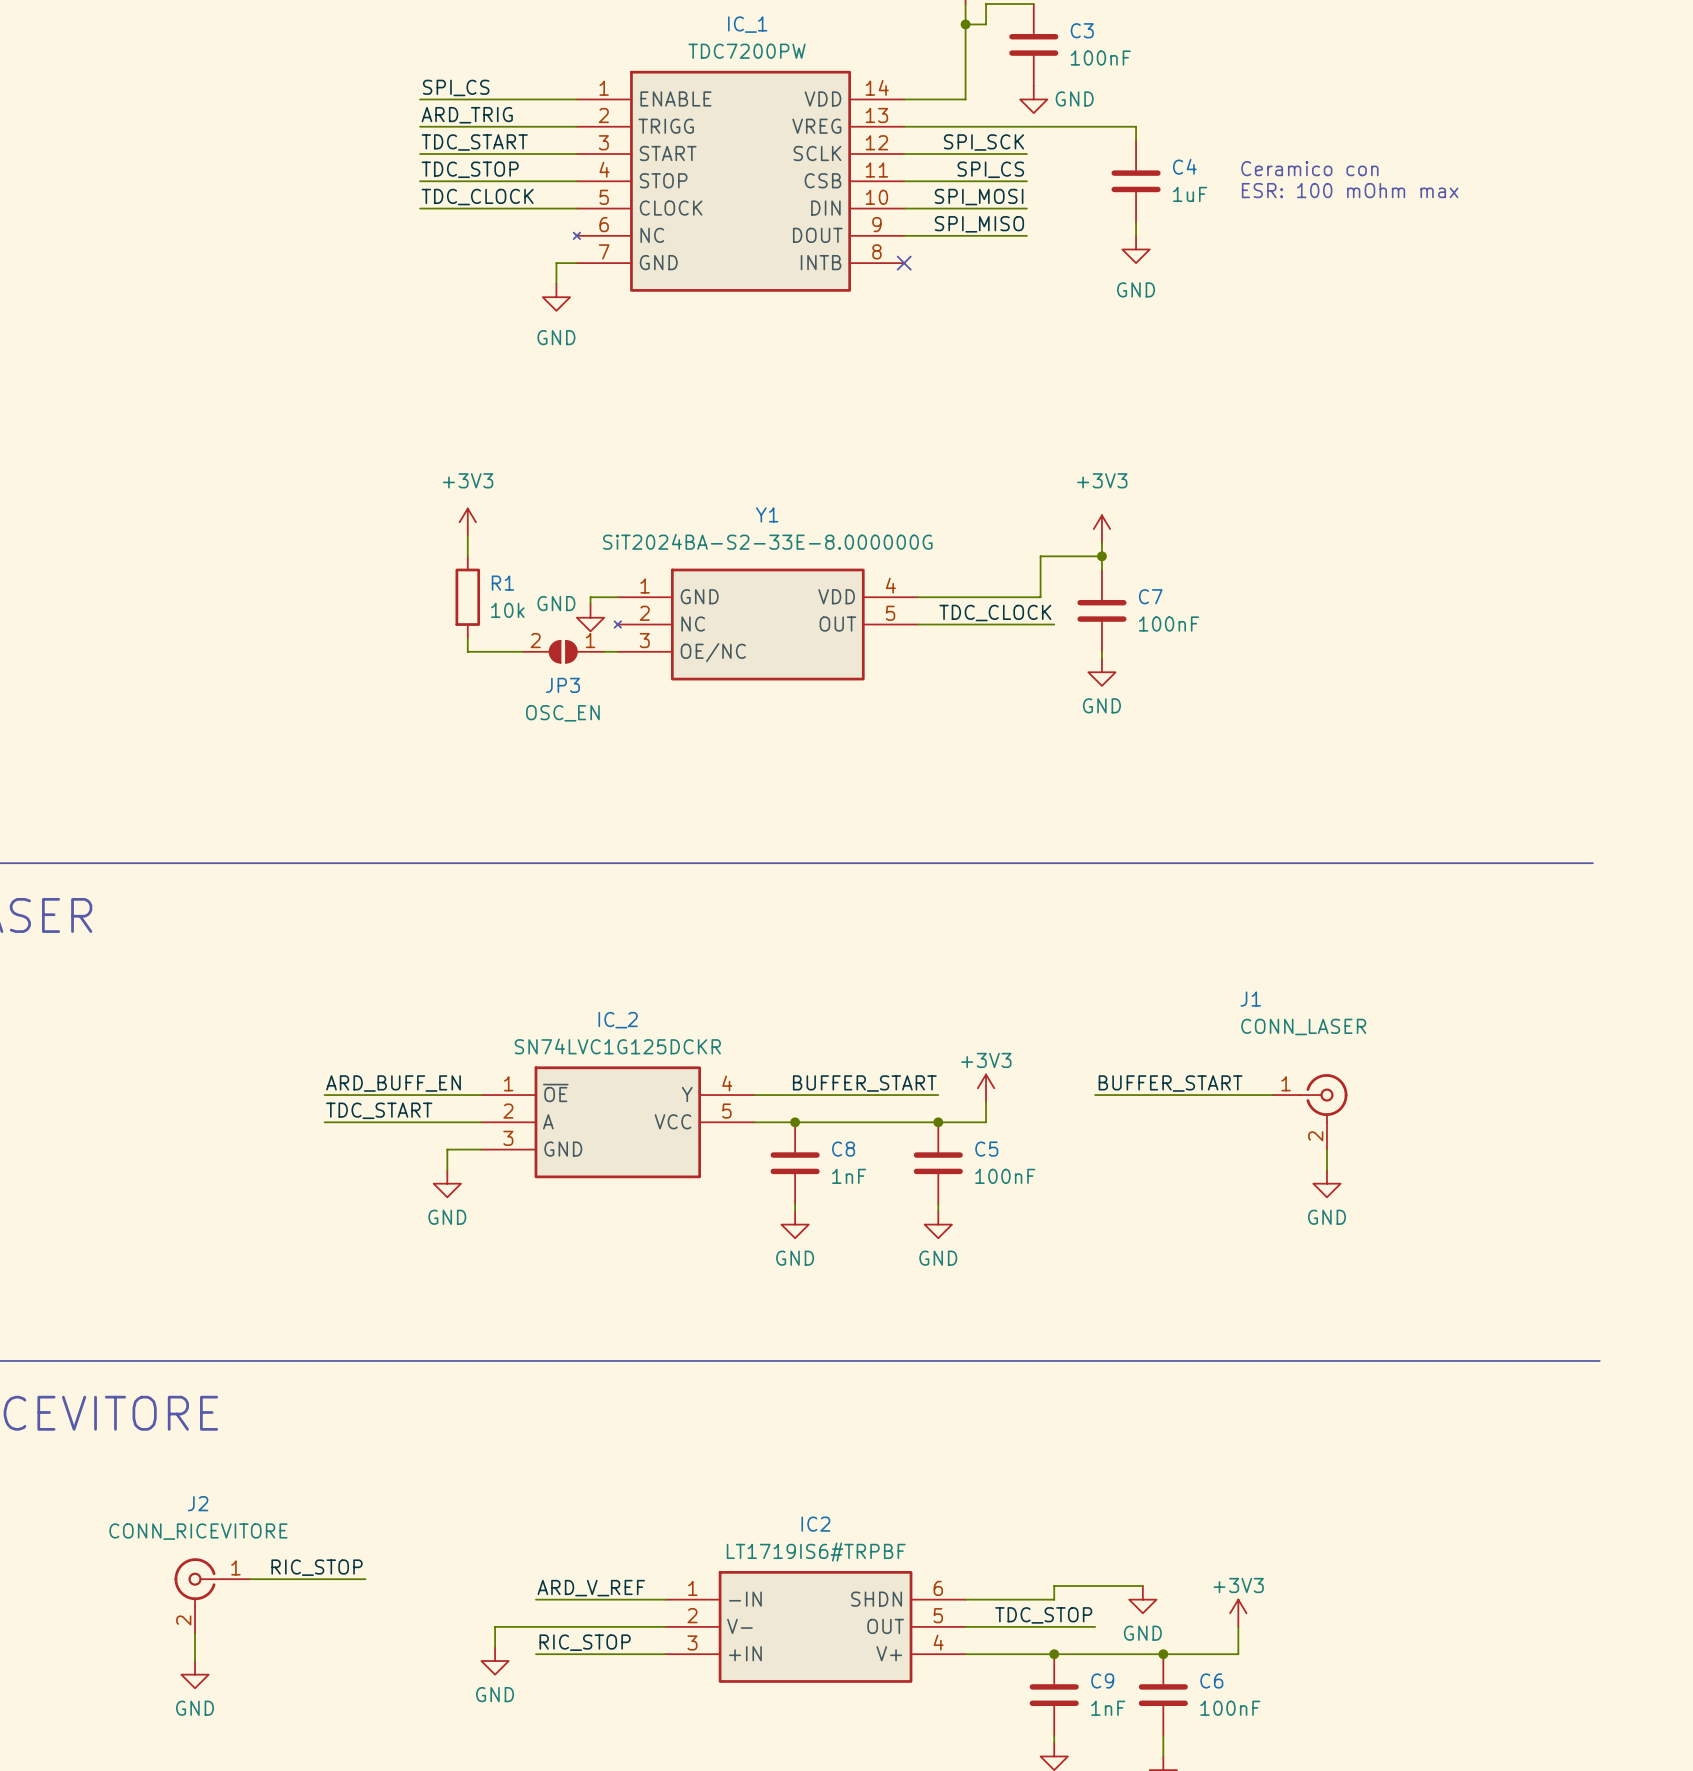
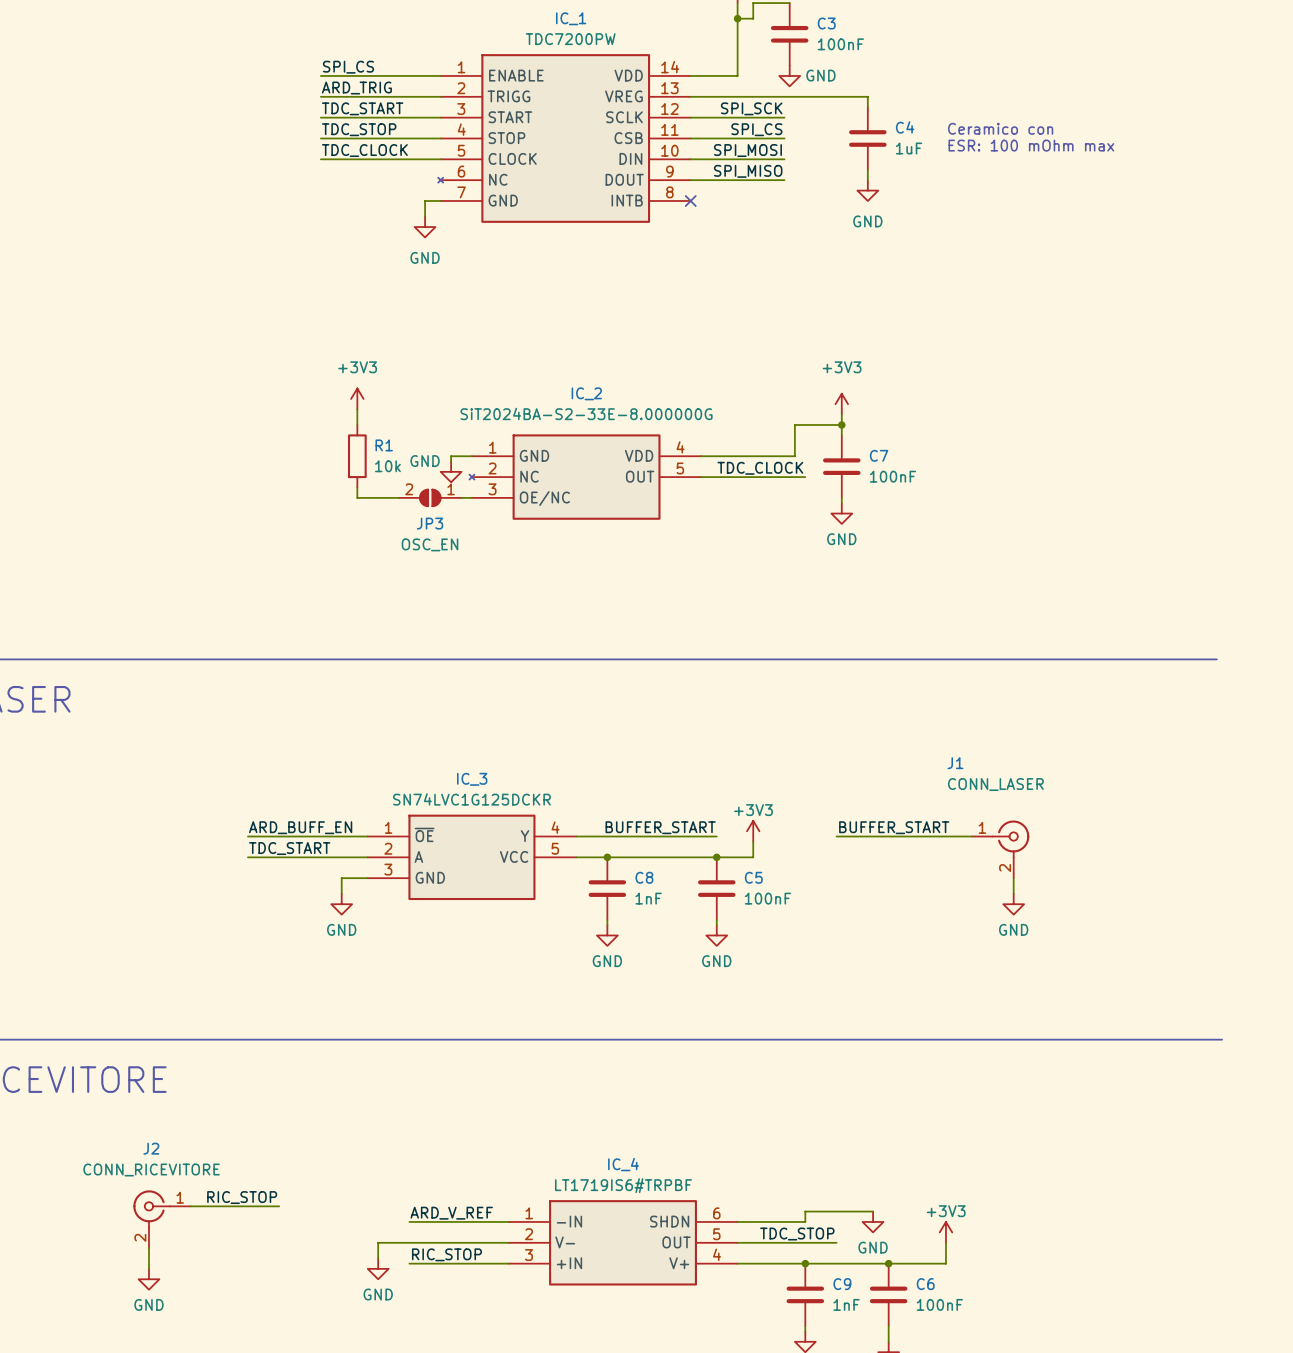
Y1 name: Y1 (767, 514) -> IC_2 (586, 393)
IC_2 name: IC_2 (618, 1020) -> IC_3 (472, 779)
IC2 name: IC2 (815, 1524) -> IC_4 (623, 1164)

